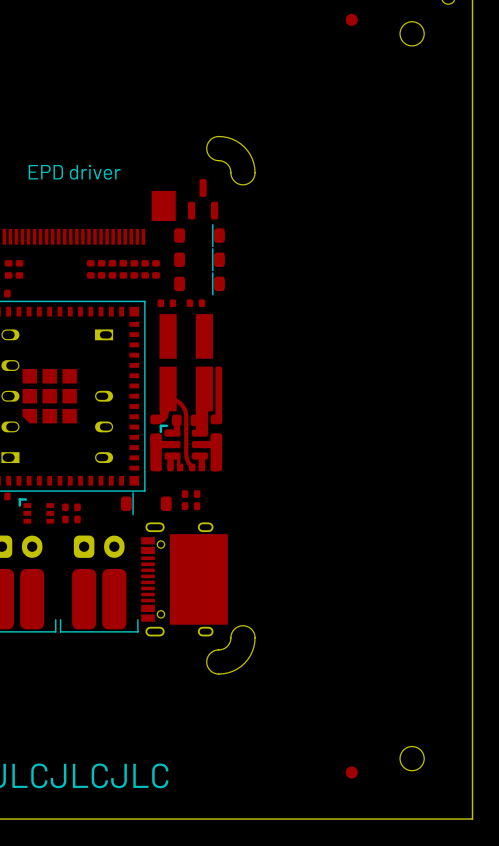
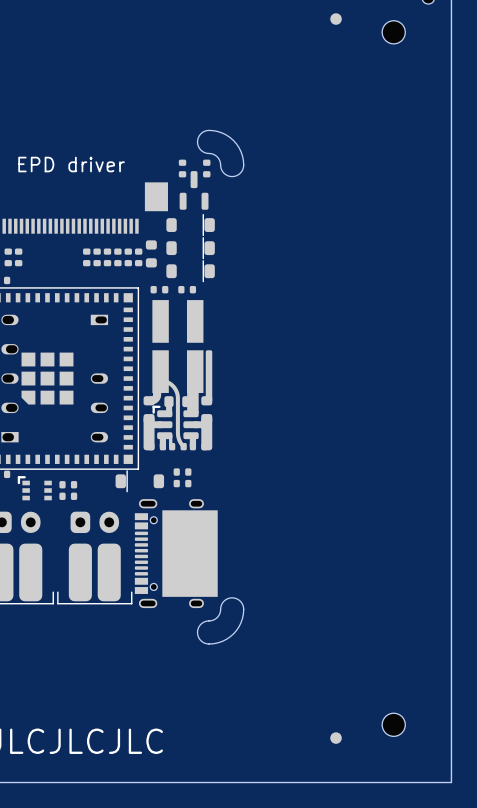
part: none -> (182, 168)
part: none -> (206, 168)
part footprint: [152, 260, 160, 279] -> [145, 240, 157, 268]

